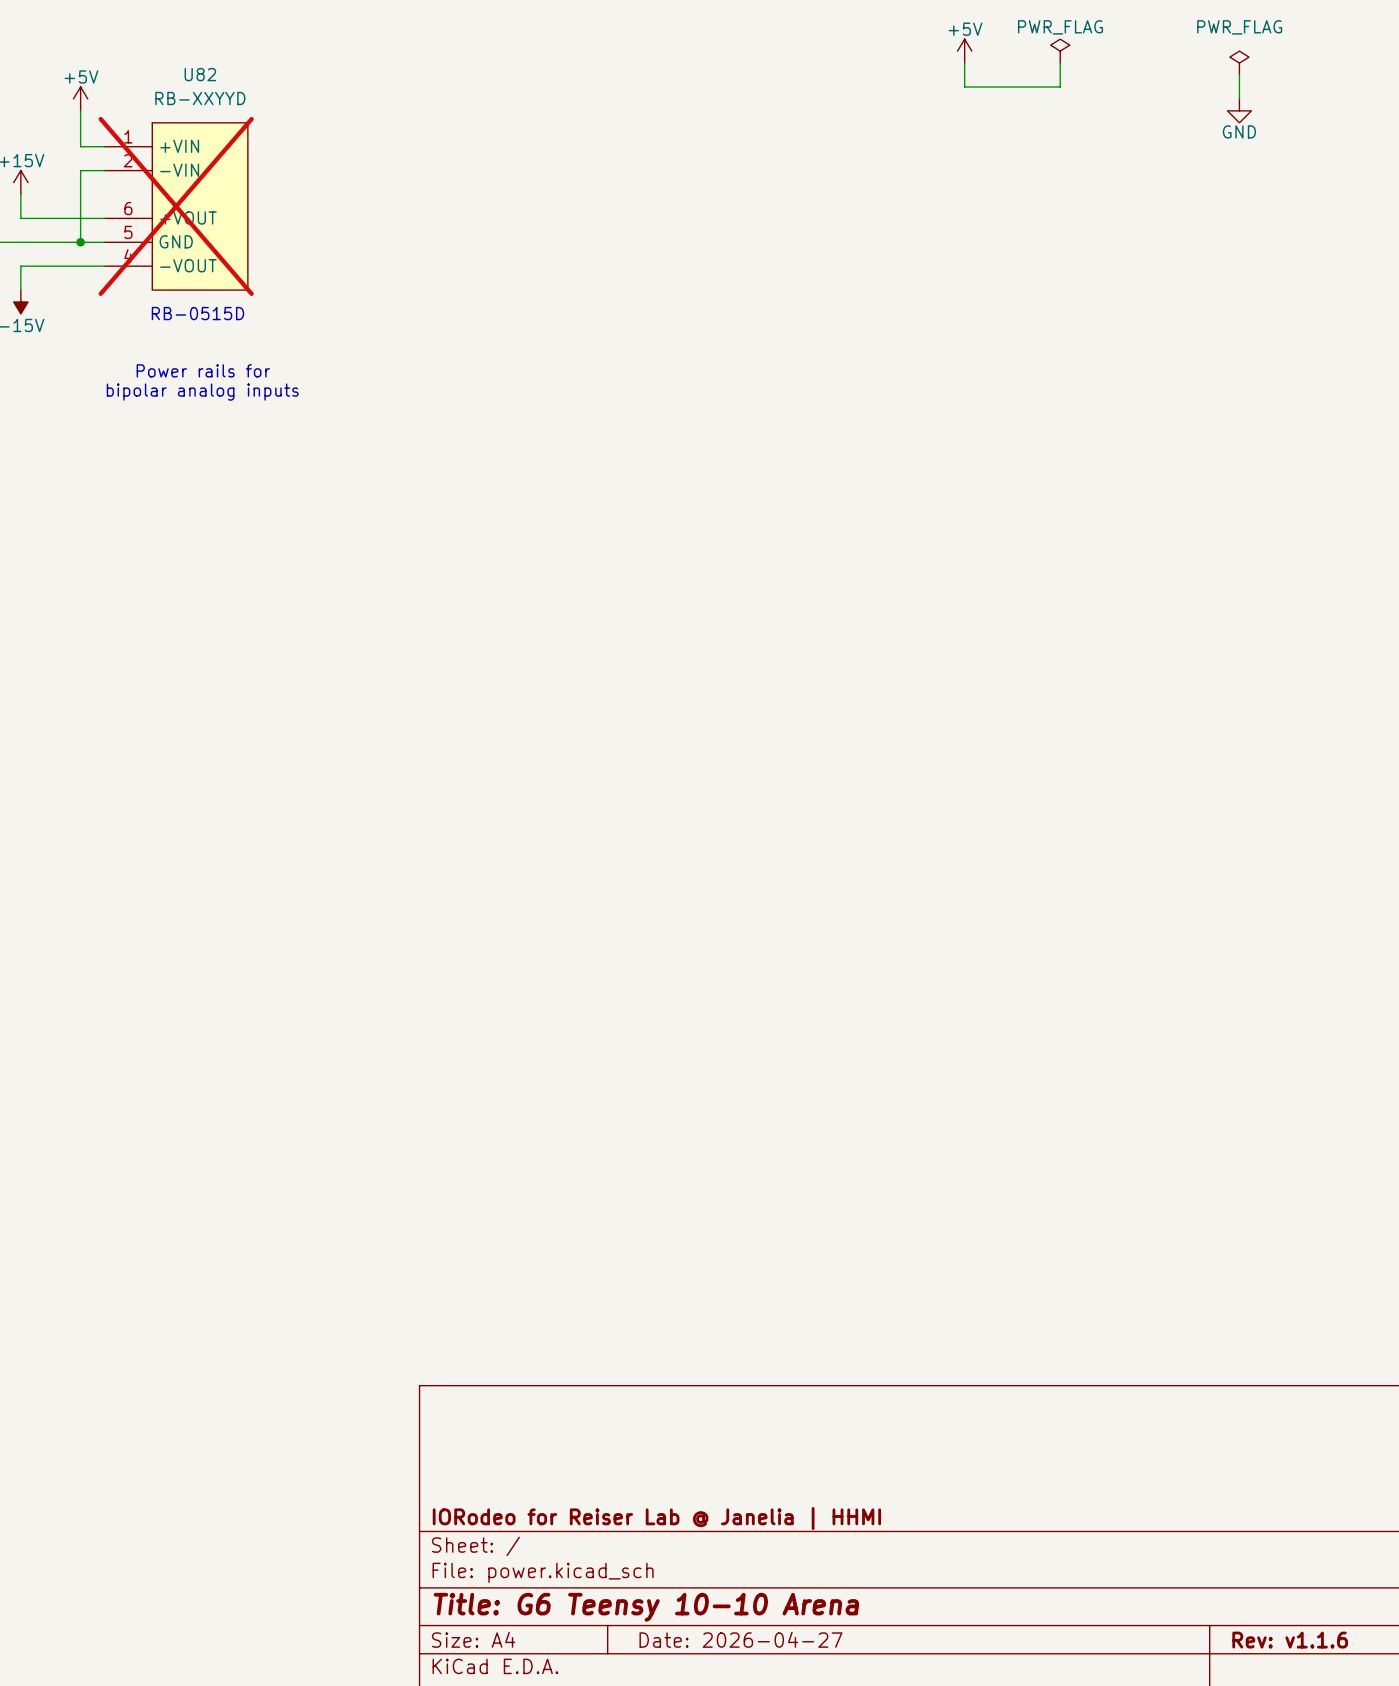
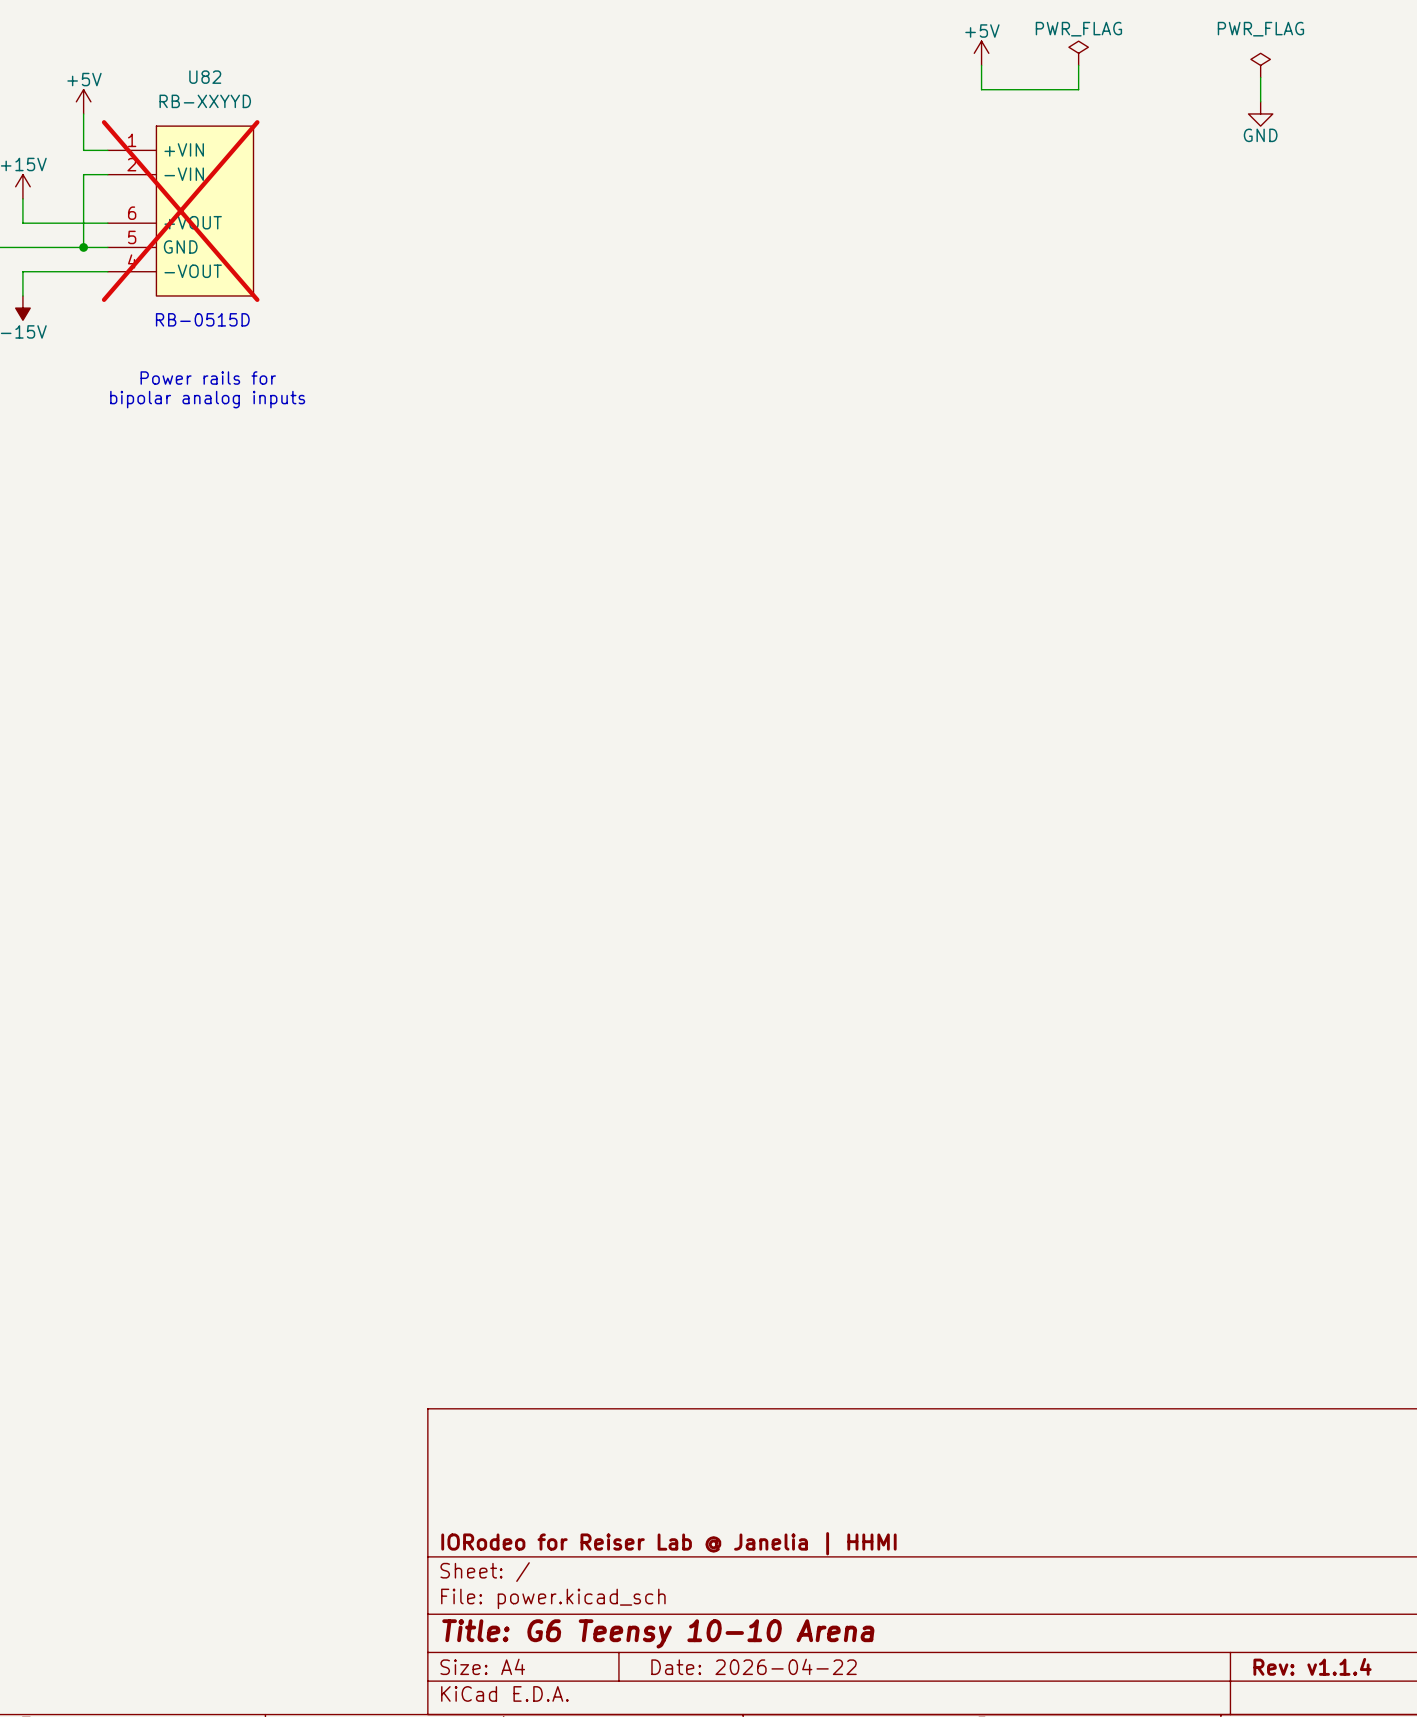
title block: Date: 2026-04-27 (740, 1639) -> Date: 2026-04-22 (754, 1666)
title block: Rev: v1.1.6 (1290, 1640) -> Rev: v1.1.4 (1312, 1666)

